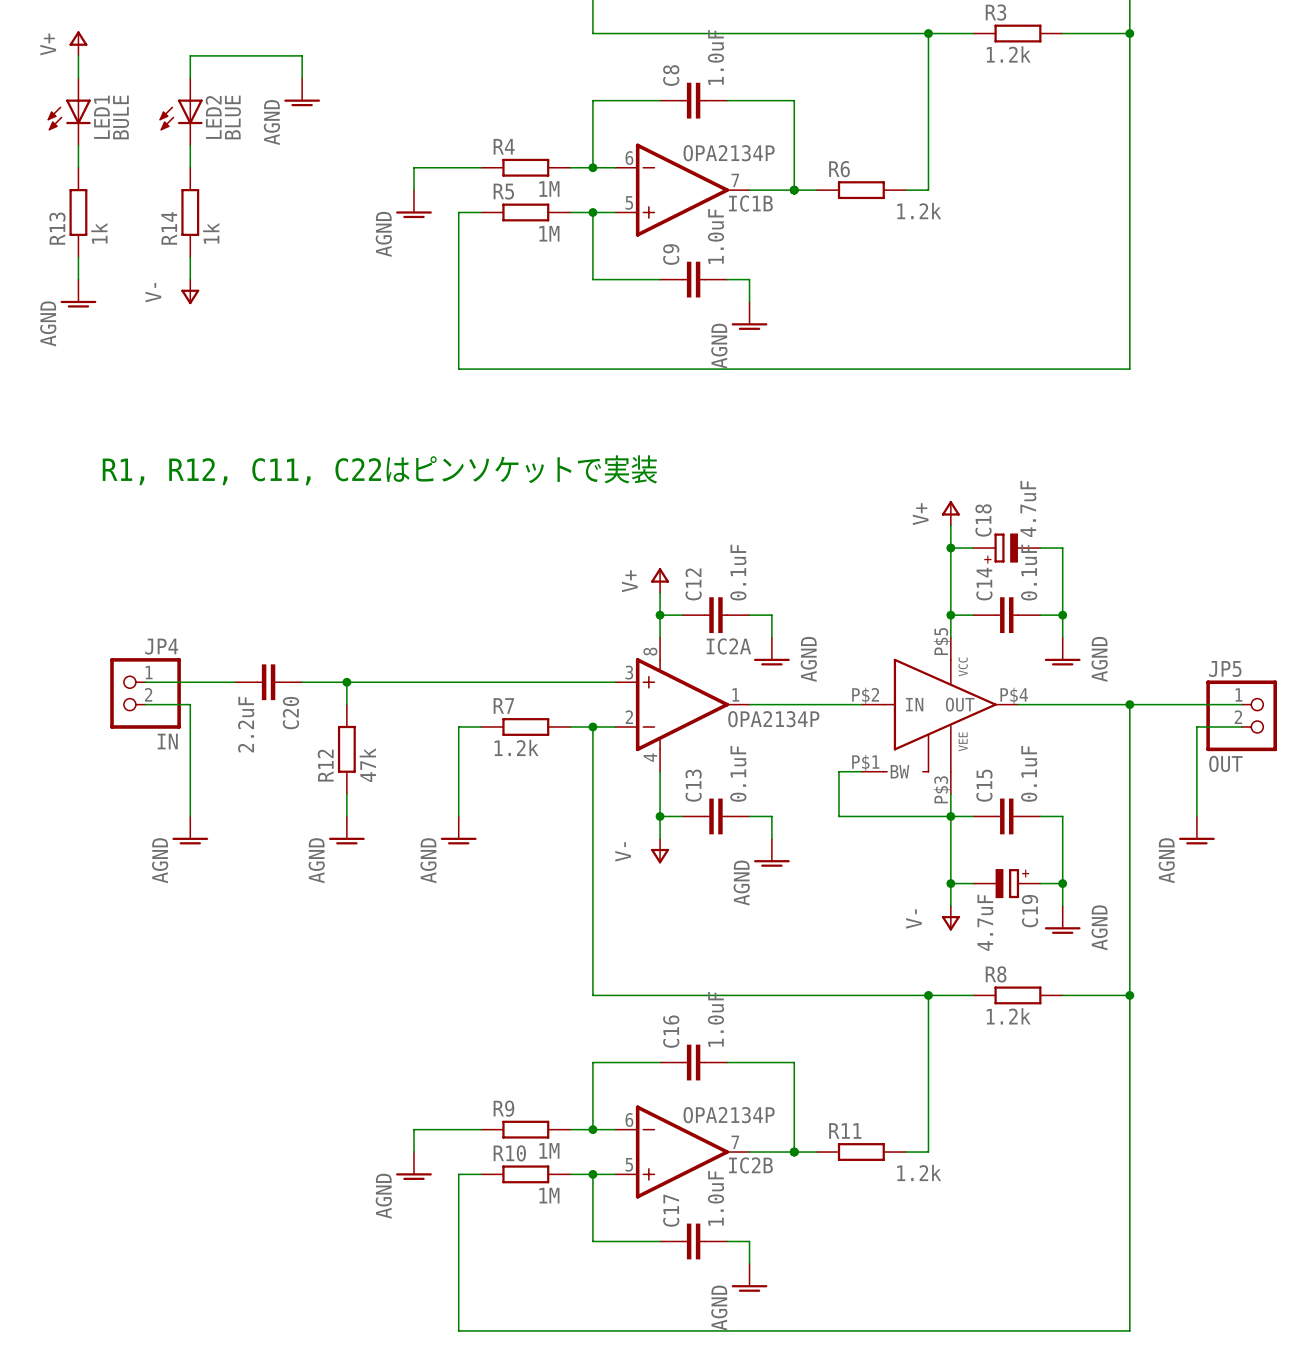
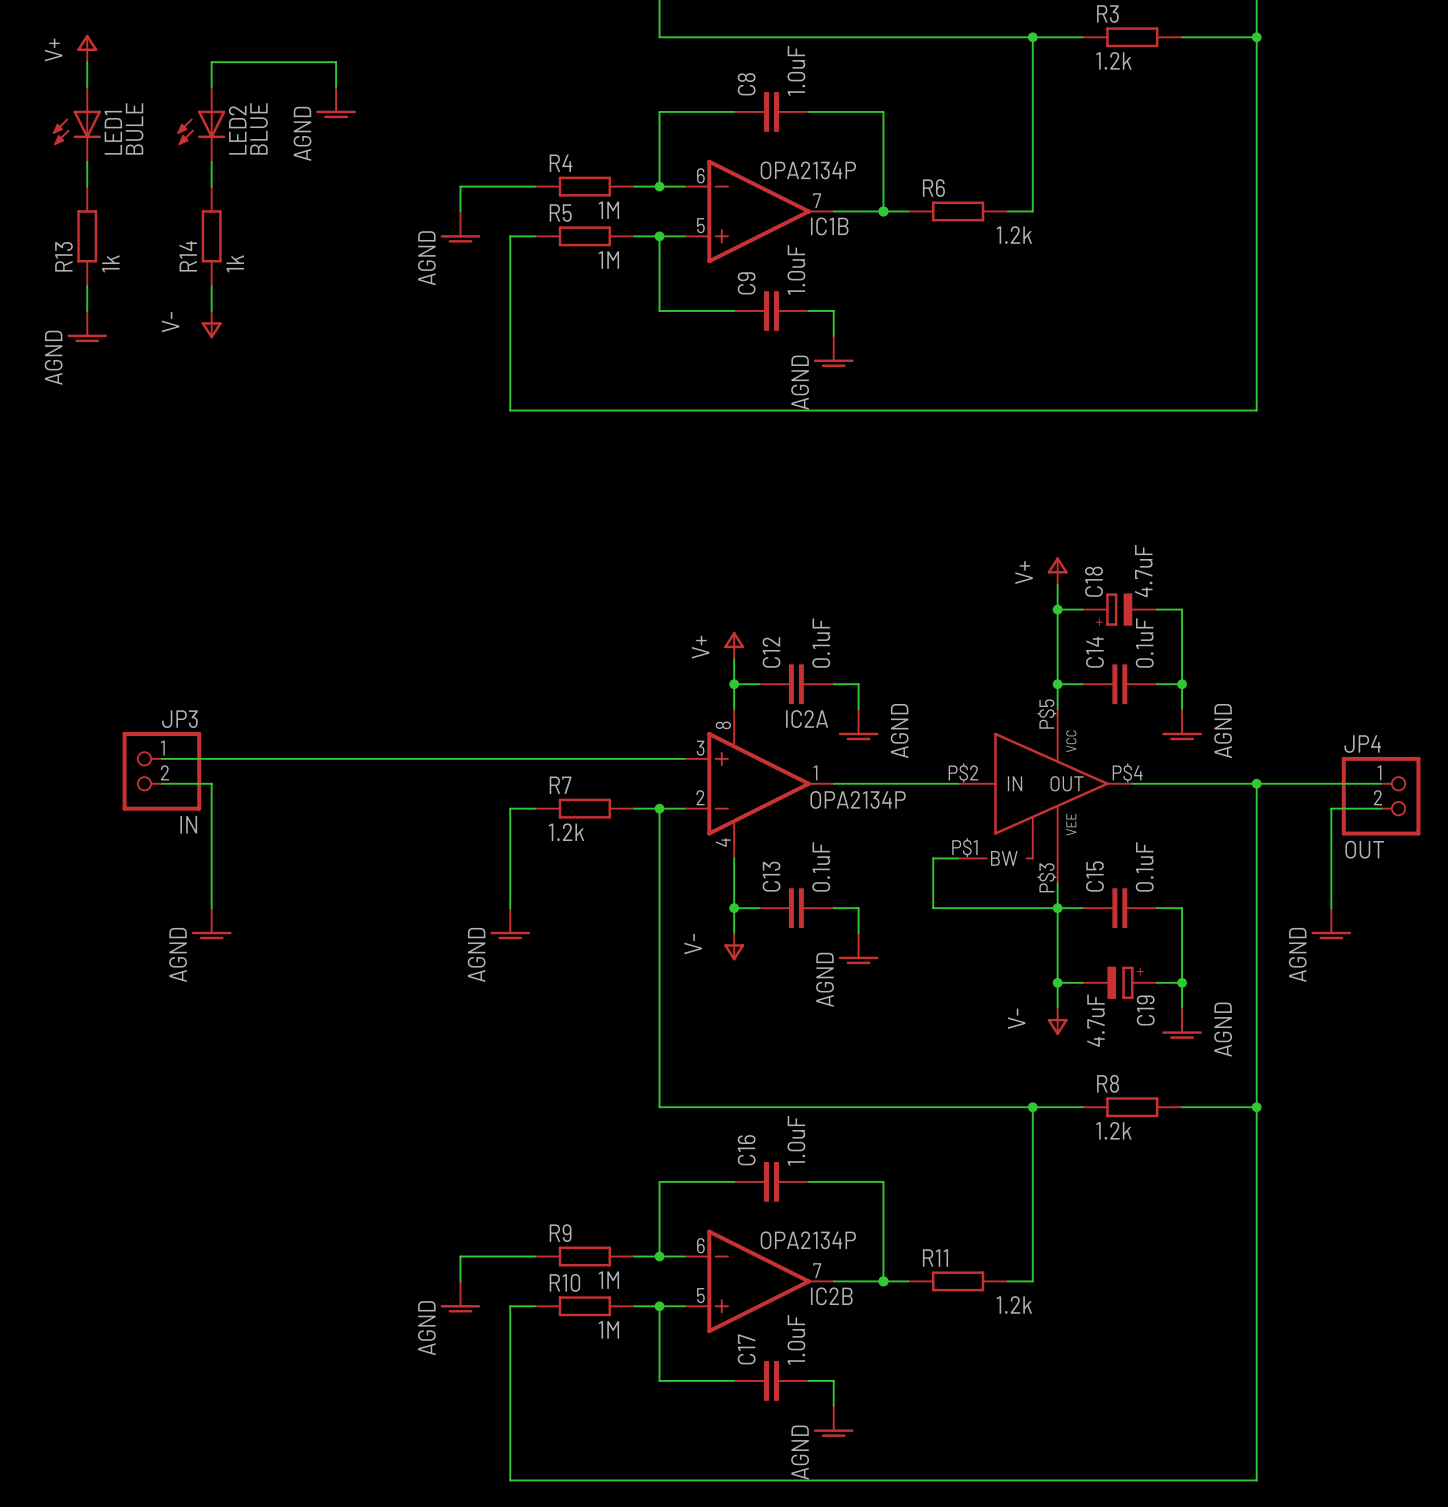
text: R1, R12, C11, C22はピンソケットで実装 (379, 470) -> none
JP4 name: JP4 (161, 646) -> JP3 (179, 719)
JP5 name: JP5 (1225, 668) -> JP4 (1362, 744)
C20: 2.2uF (268, 682) -> none
wire: (346, 682) (346, 704) -> none
junction: (346, 682) -> none
R12: 47k (346, 749) -> none
wire: (346, 794) (346, 816) -> none
power symbol: AGND (346, 830) -> none

